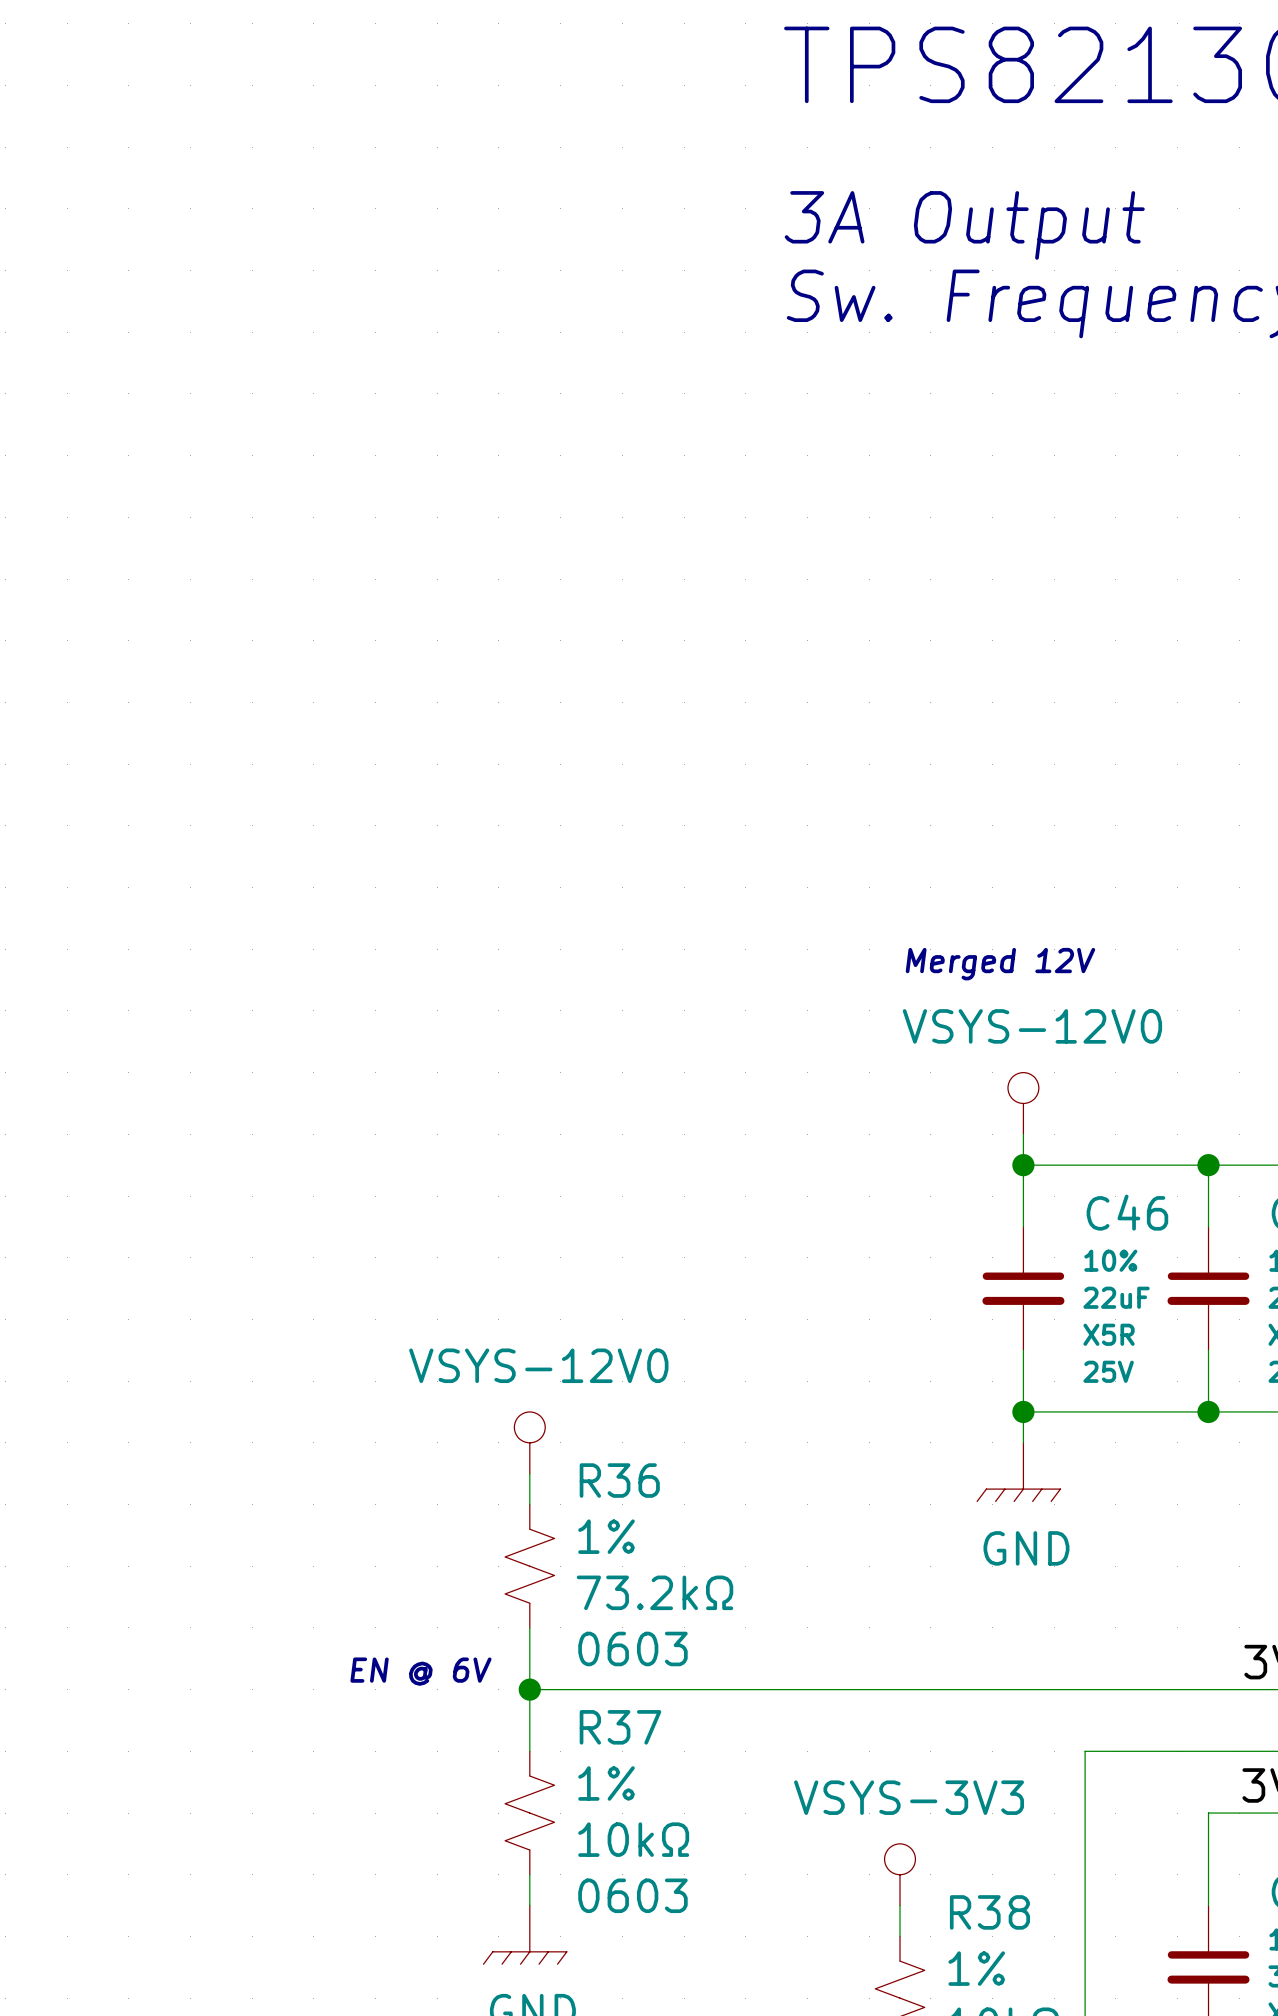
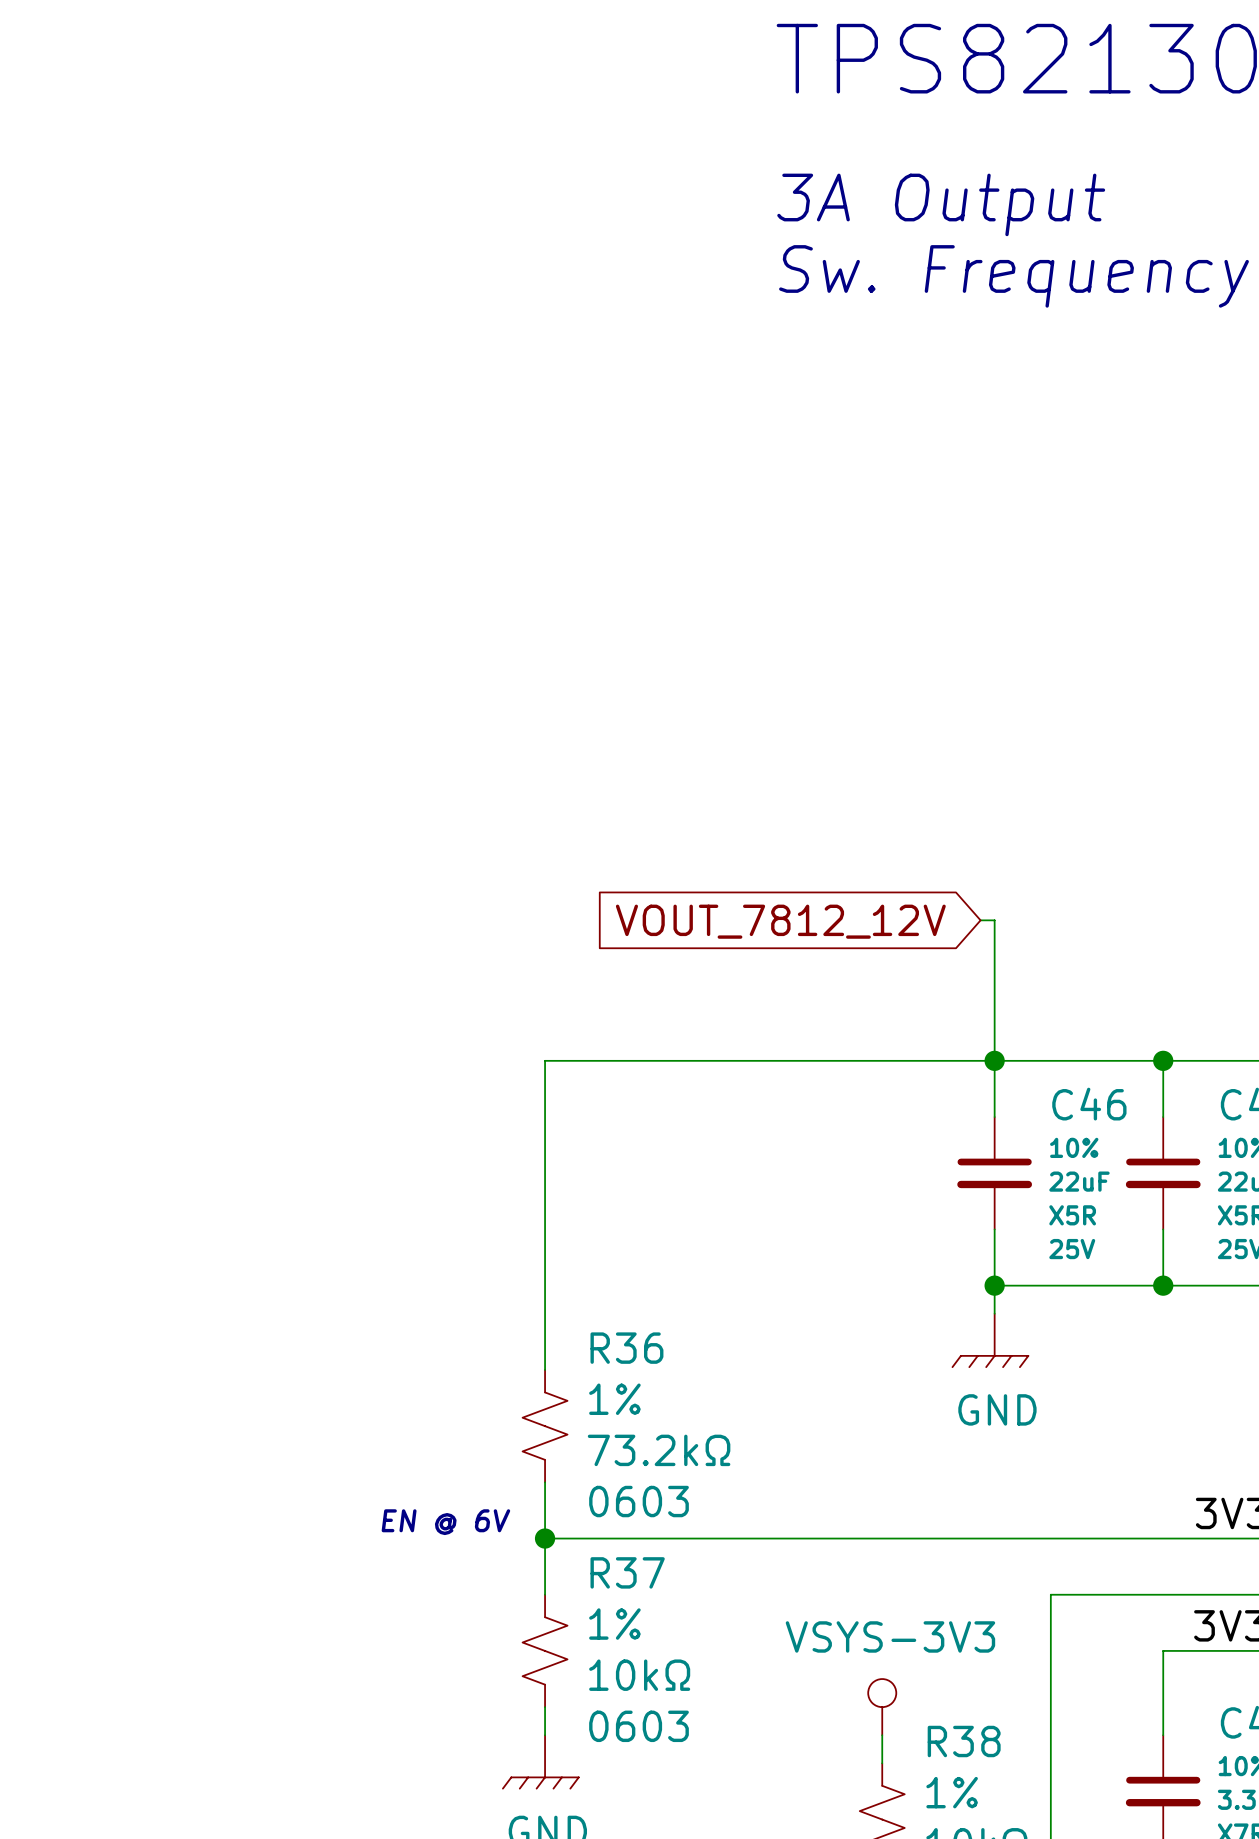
text: Merged 12V (1000, 964) -> none
wire: none -> (980, 920) (994, 920) (994, 1032)
global label: none -> VOUT_7812_12V (780, 921)
power symbol: VSYS-12V0 (1023, 1103) -> none
wire: none -> (994, 1060) (545, 1060) (545, 1341)
power symbol: VSYS-12V0 (529, 1442) -> none

